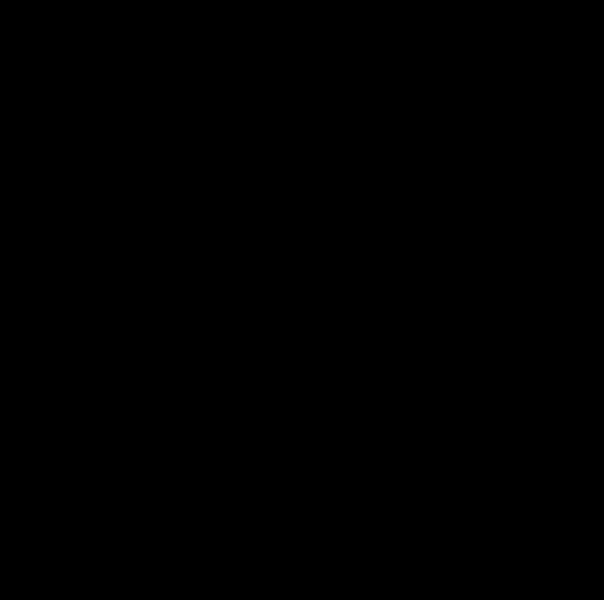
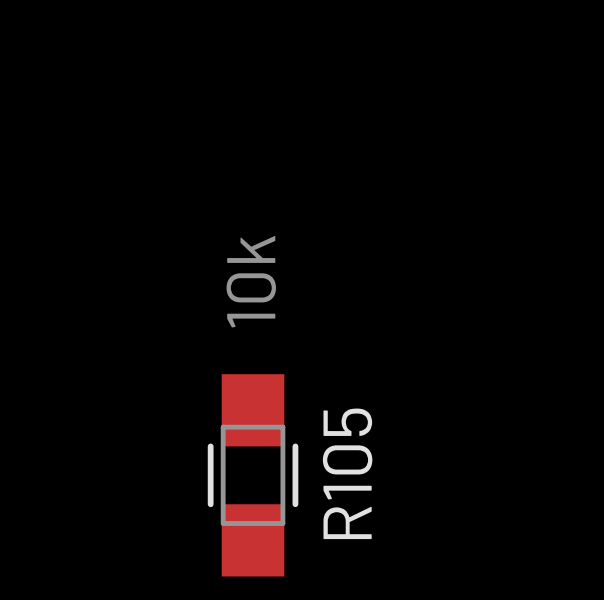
R105: none -> 10k (253, 475)

